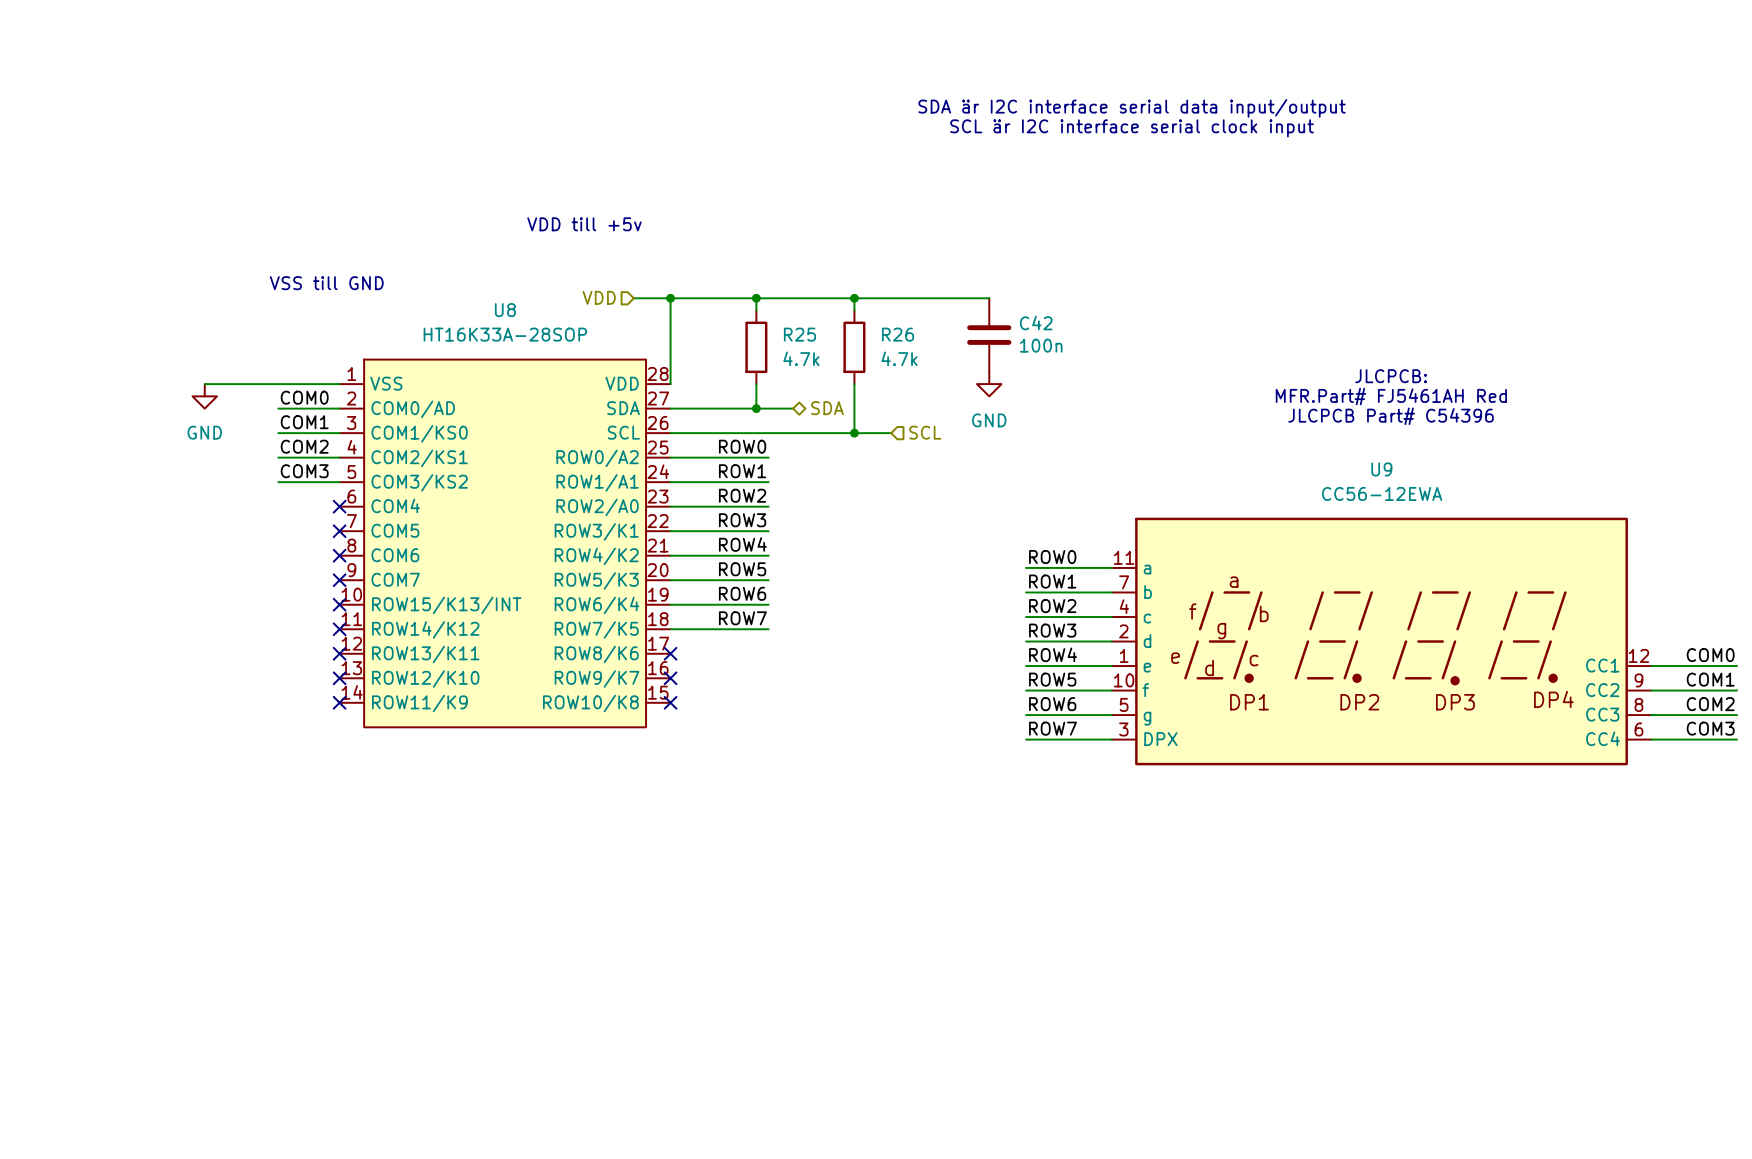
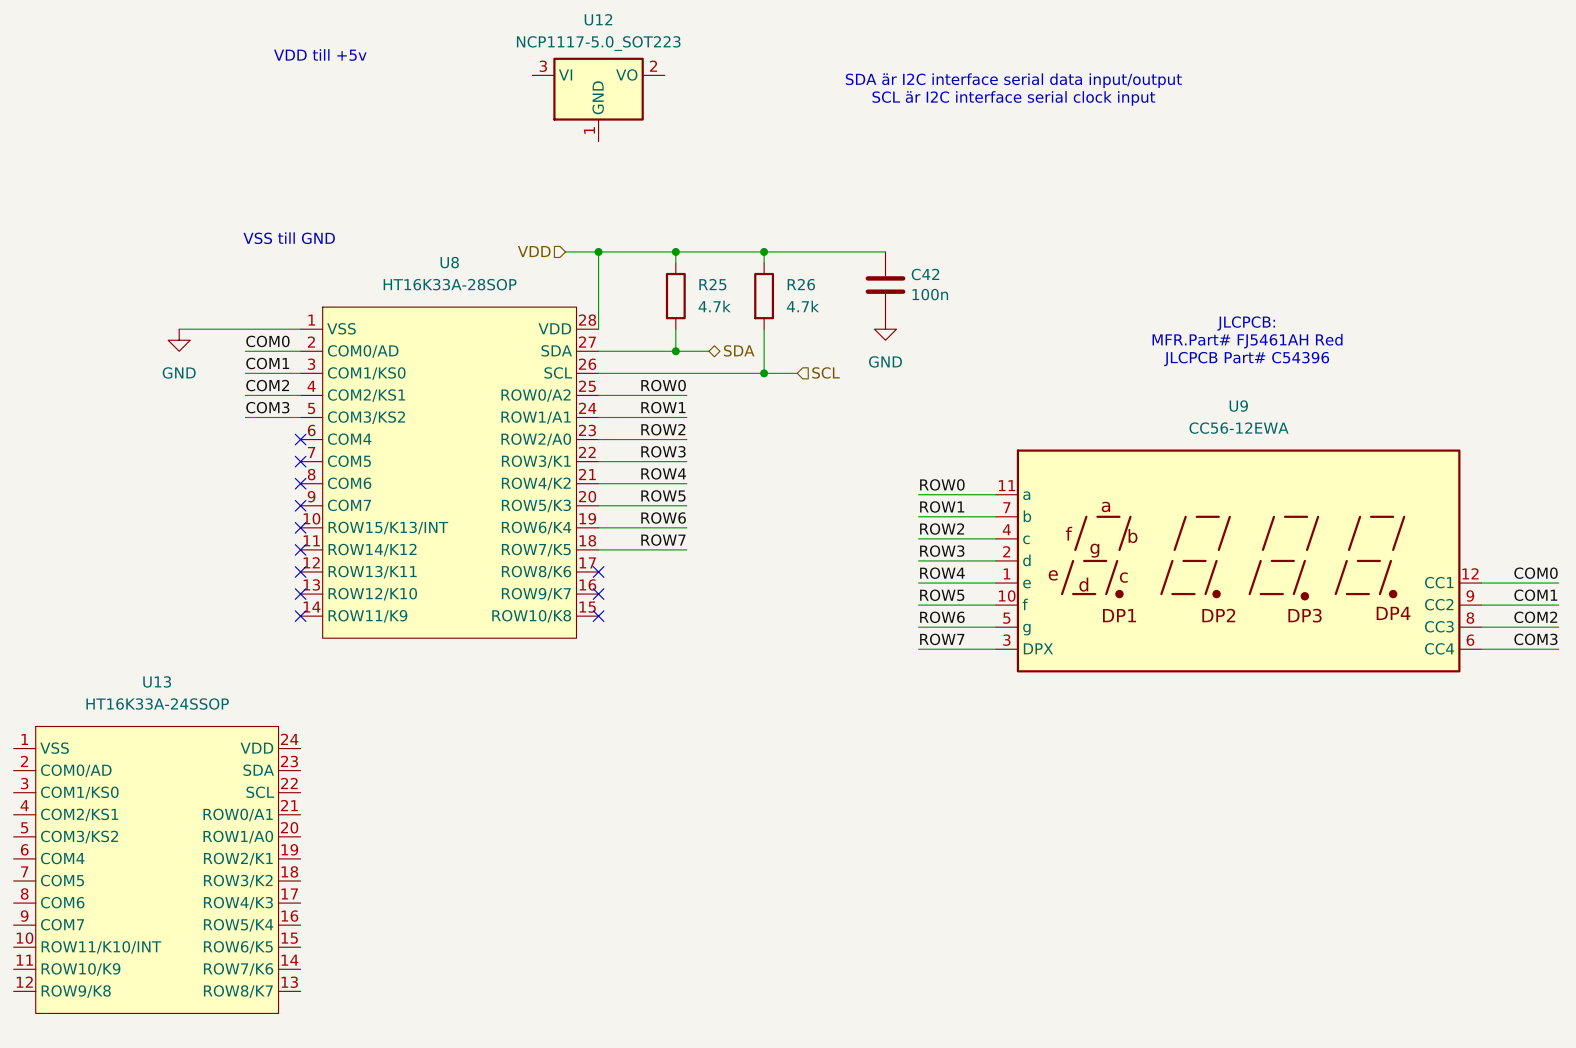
text: none -> VDD till +5v (320, 55)
U12: none -> NCP1117-5.0_SOT223 (598, 99)
text: VDD till +5v (584, 224) -> none
U13: none -> HT16K33A-24SSOP (157, 869)

